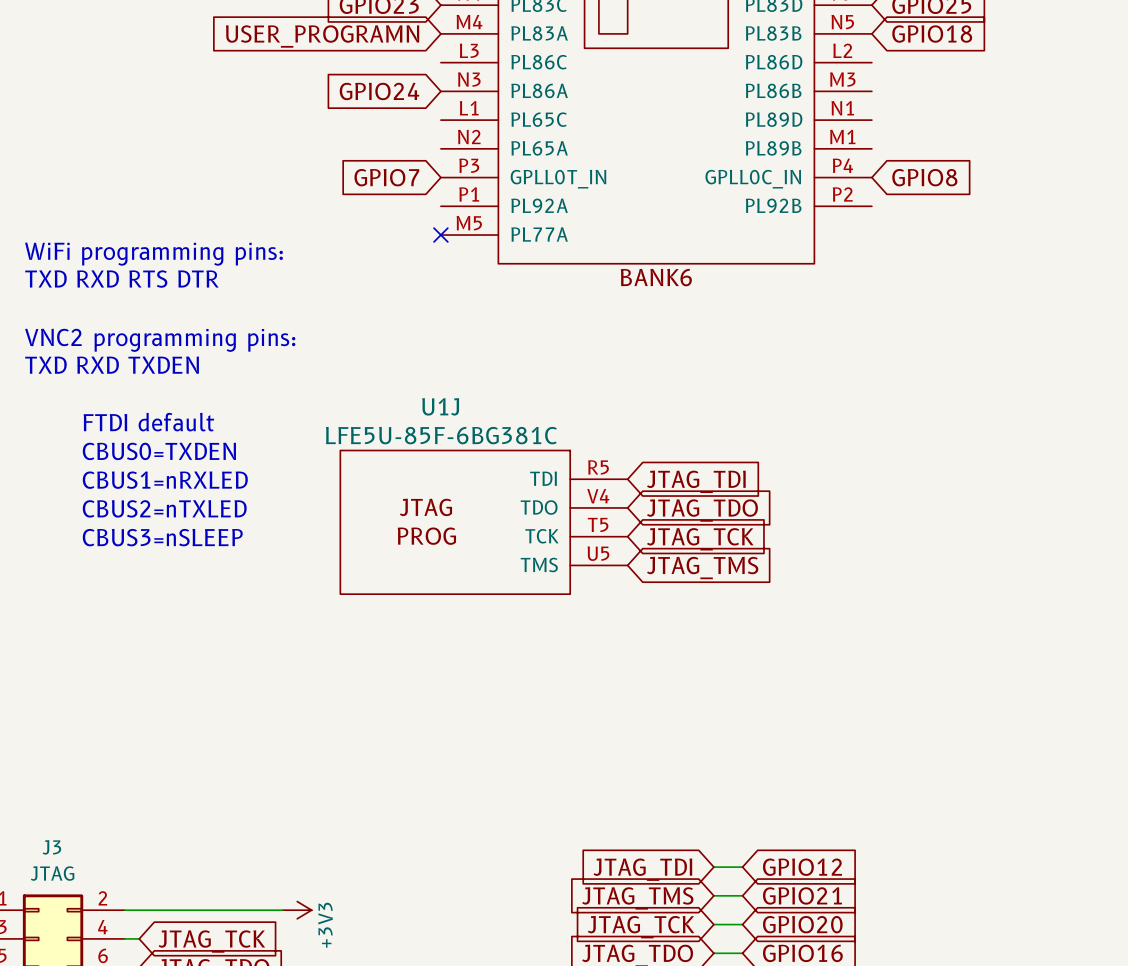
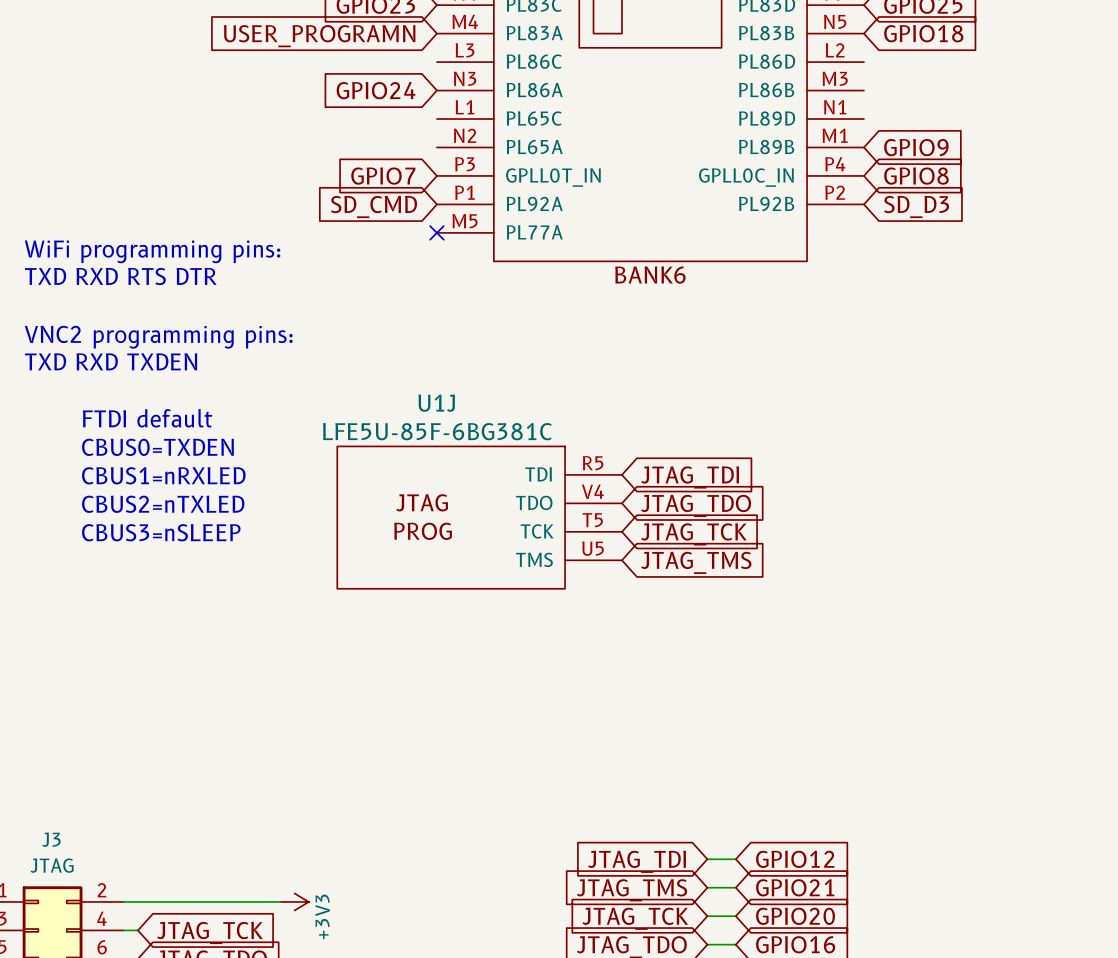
global label: none -> GPIO9 (916, 147)
global label: none -> SD_CMD (373, 206)
global label: none -> SD_D3 (916, 207)

